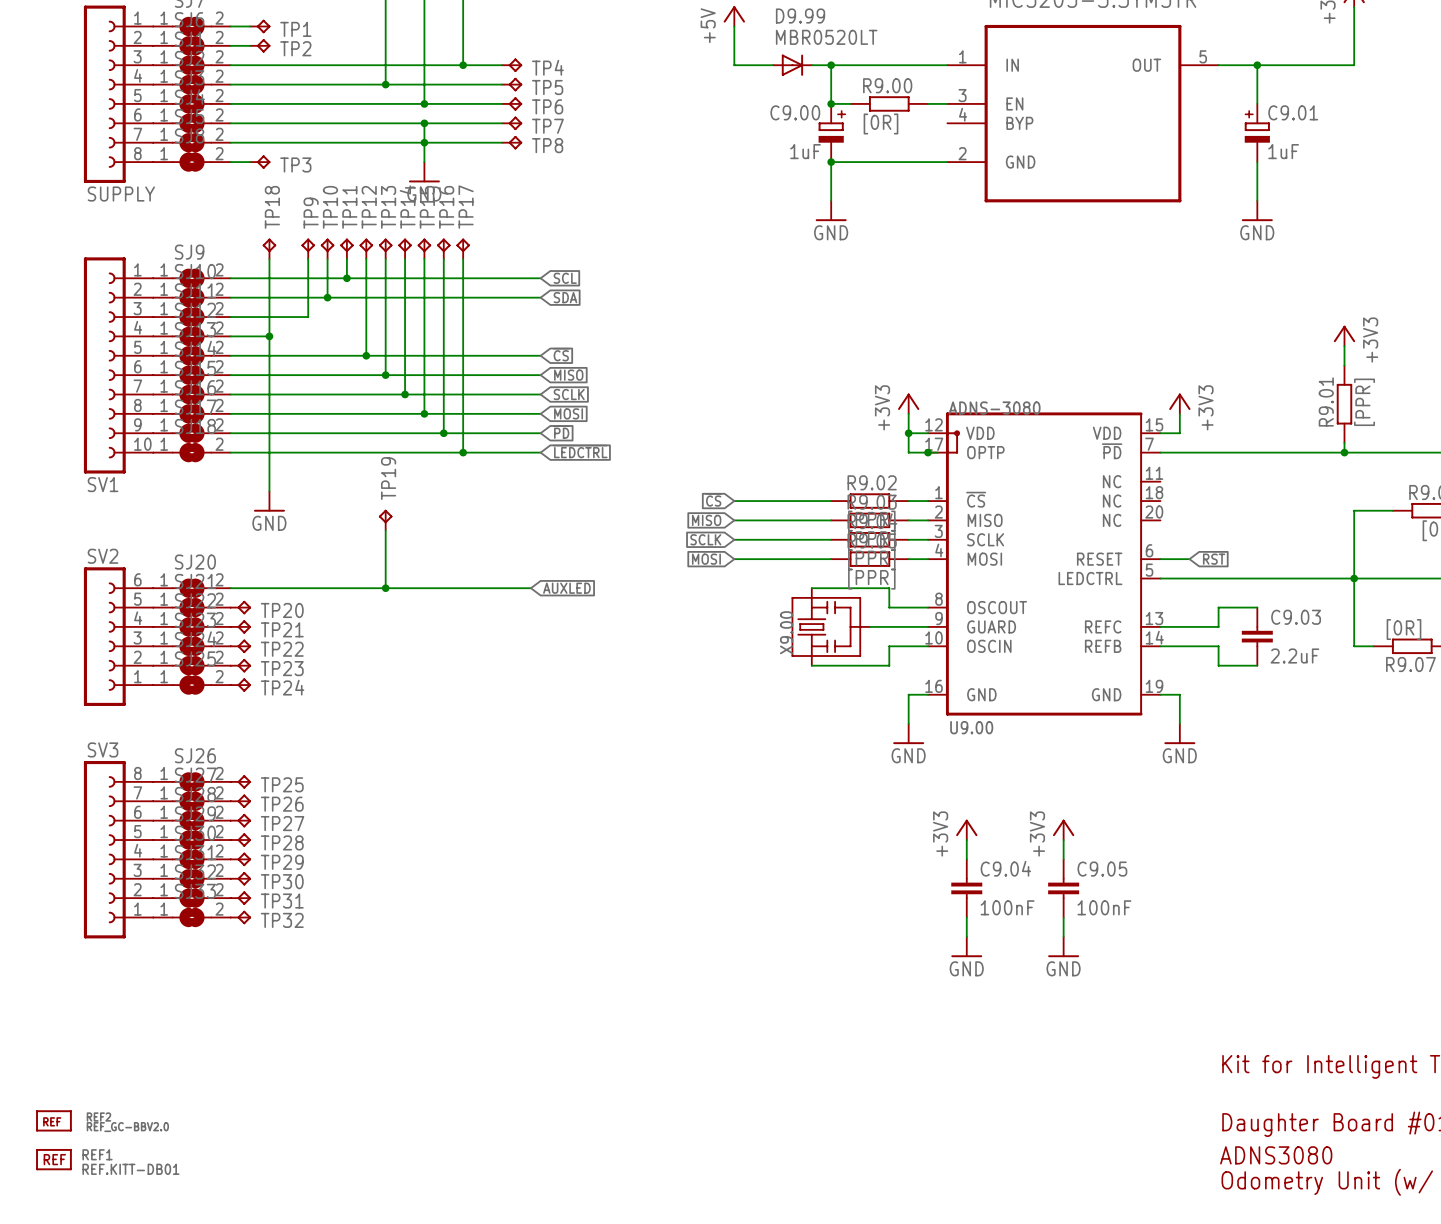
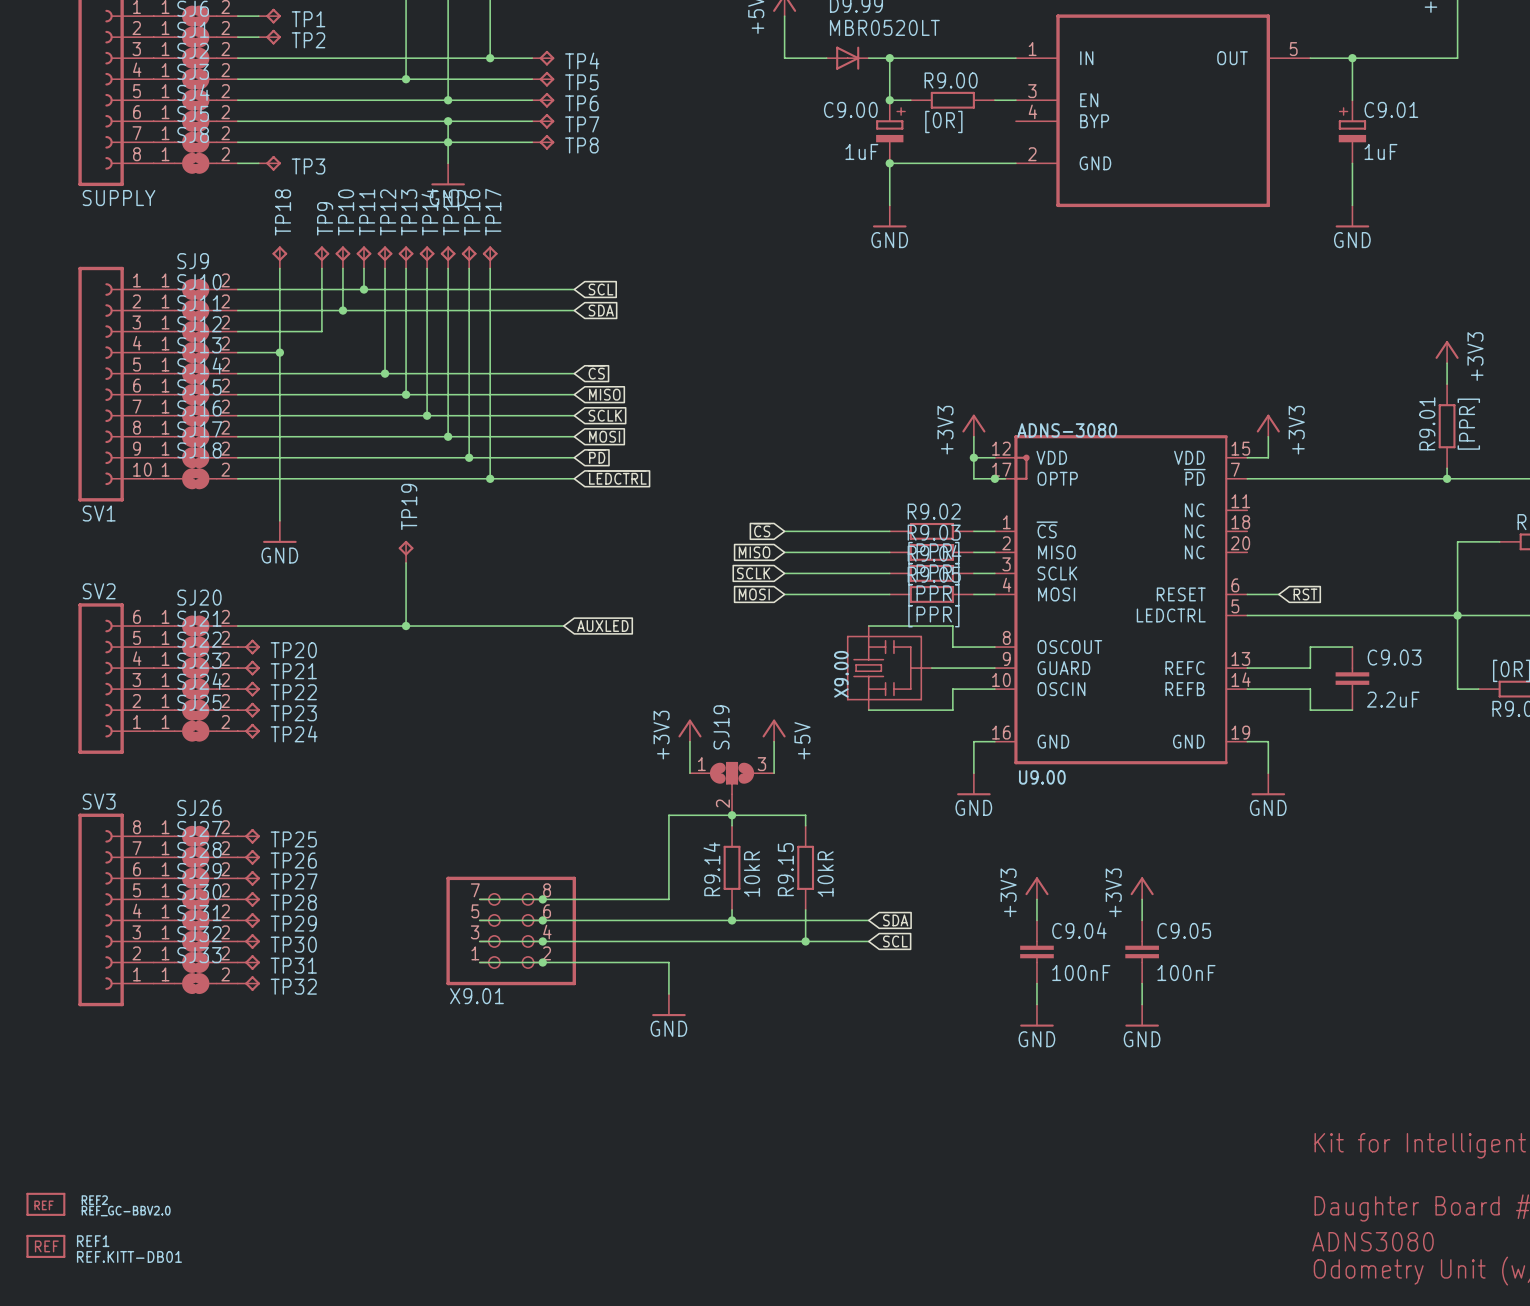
power symbol: none -> +3V3 (689, 730)
power symbol: none -> +5V (774, 730)
wire: none -> (689, 741) (689, 773)
wire: none -> (774, 741) (774, 773)
SJ19: none -> (732, 788)
wire: none -> (732, 815) (732, 825)
junction: none -> (732, 815)
wire: none -> (805, 825) (805, 815) (668, 815) (668, 899) (479, 899)
R9.14: none -> 10kR (732, 867)
R9.15: none -> 10kR (805, 867)
junction: none -> (542, 899)
wire: none -> (732, 909) (732, 920)
wire: none -> (805, 909) (805, 941)
wire: none -> (479, 920) (868, 920)
junction: none -> (542, 920)
junction: none -> (732, 920)
global label: none -> SDA (895, 920)
X9.01: none -> (511, 930)
wire: none -> (479, 941) (868, 941)
junction: none -> (542, 941)
junction: none -> (805, 941)
global label: none -> SCL (895, 941)
wire: none -> (479, 962) (668, 962) (668, 994)
junction: none -> (542, 962)
power symbol: none -> GND (668, 1005)

